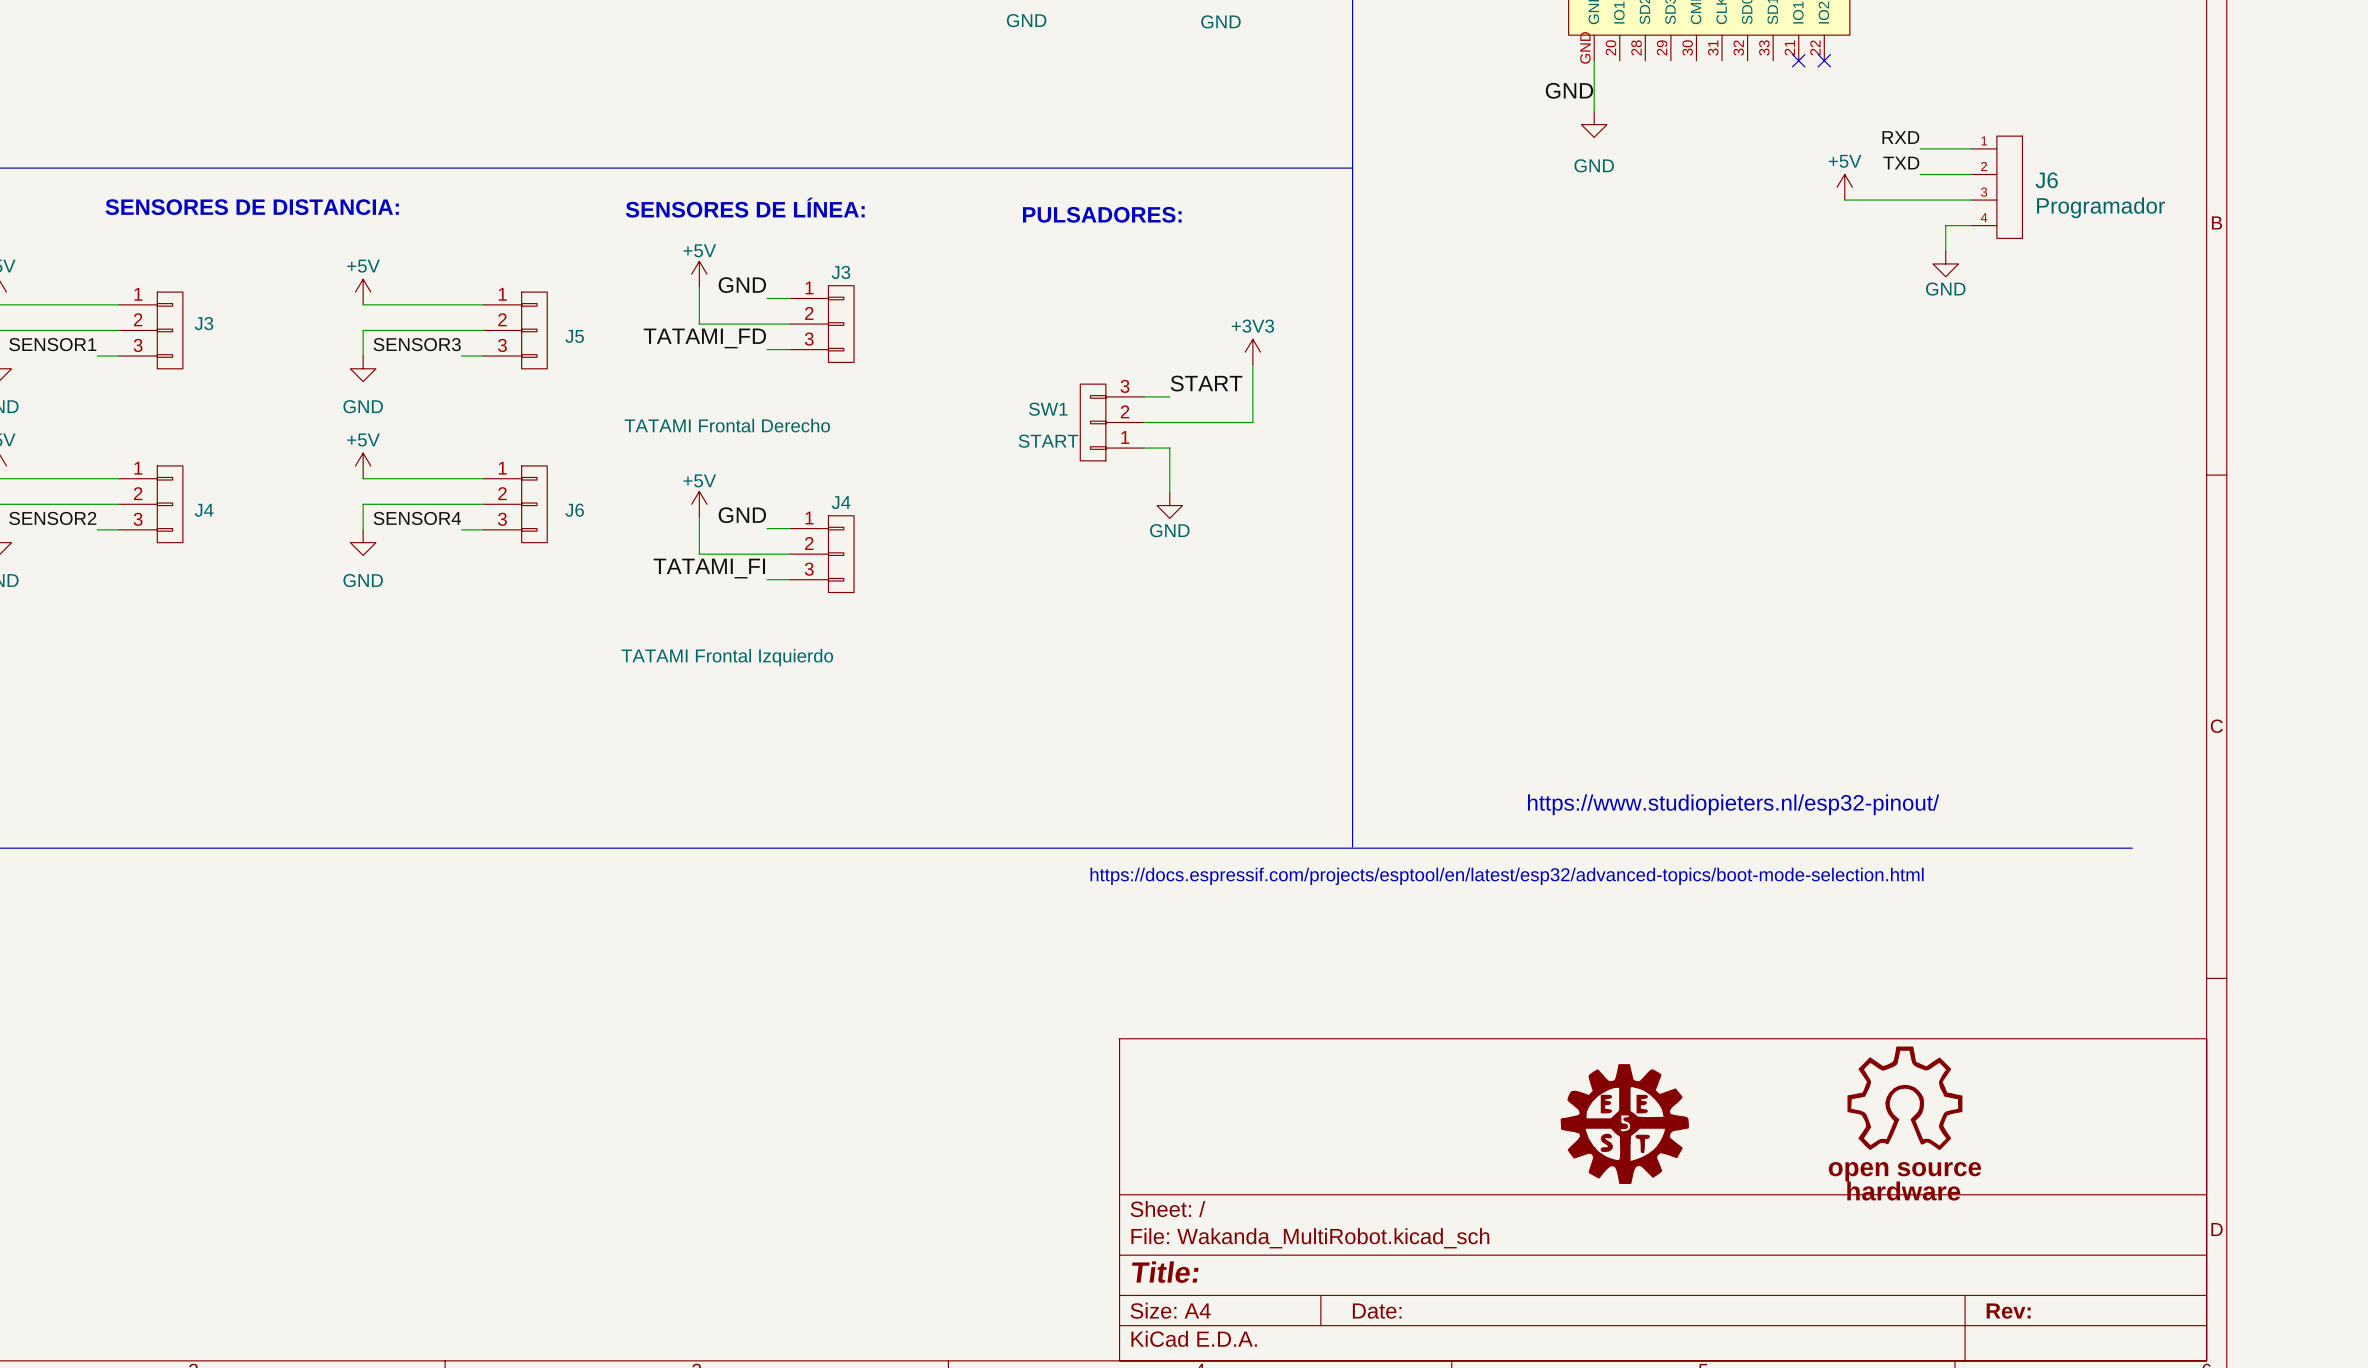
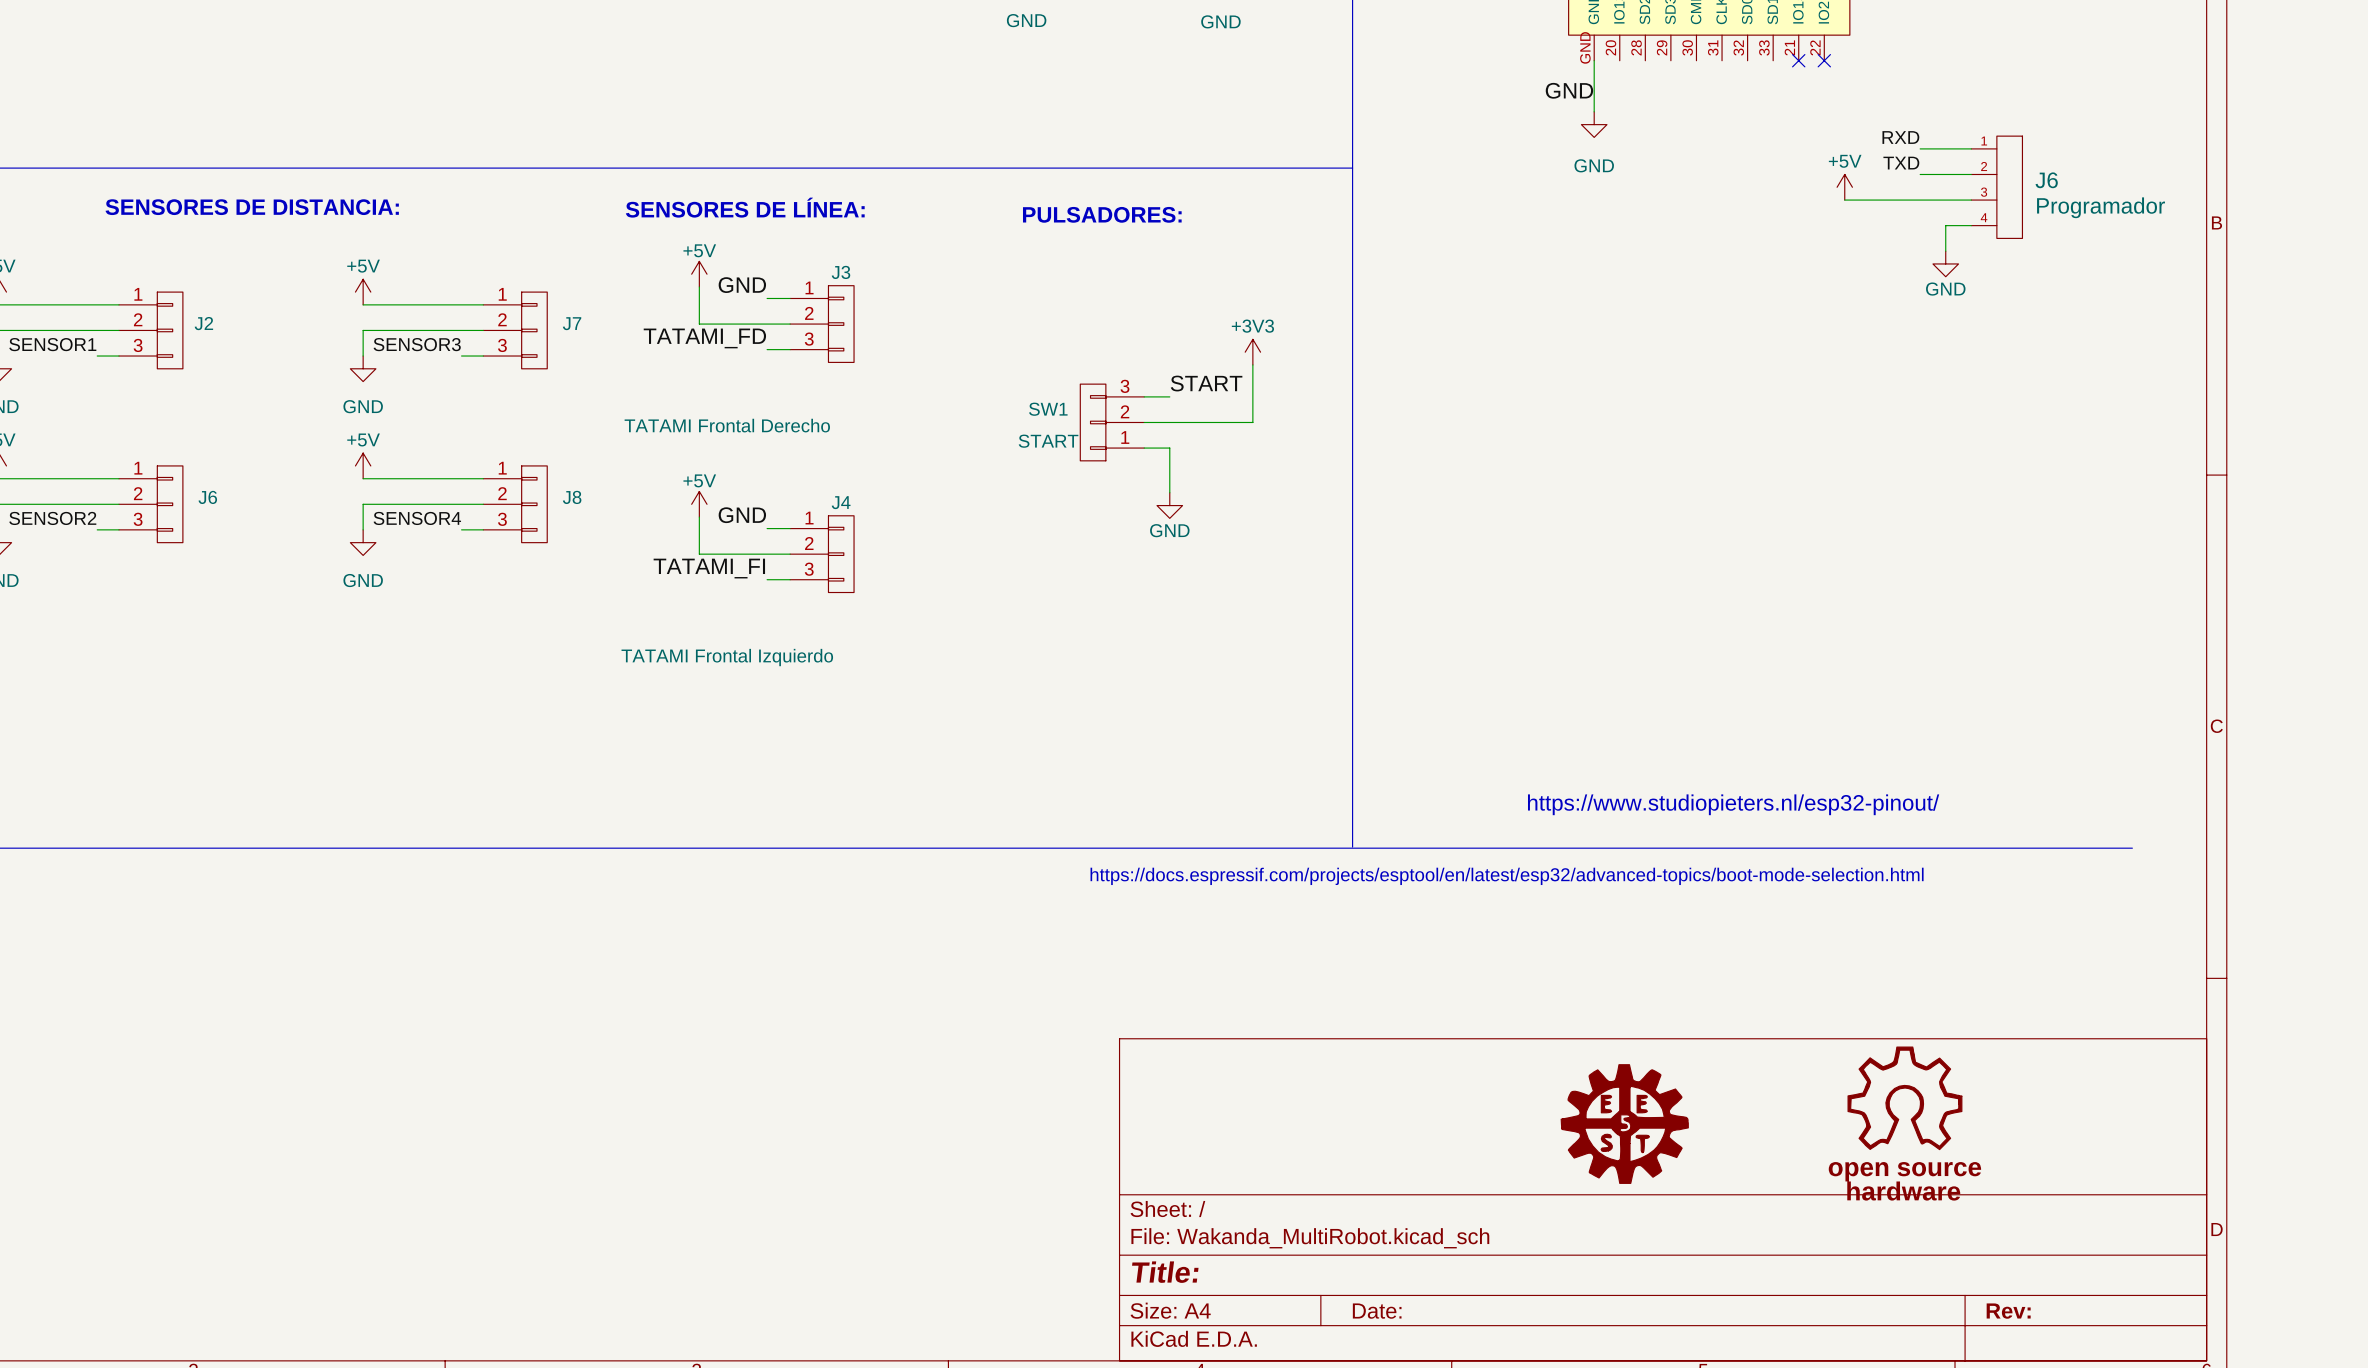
J3 name: J3 (203, 323) -> J2 (203, 323)
J5 name: J5 (574, 336) -> J7 (572, 323)
J4 name: J4 (204, 510) -> J6 (207, 497)
J6 name: J6 (574, 510) -> J8 (572, 497)

